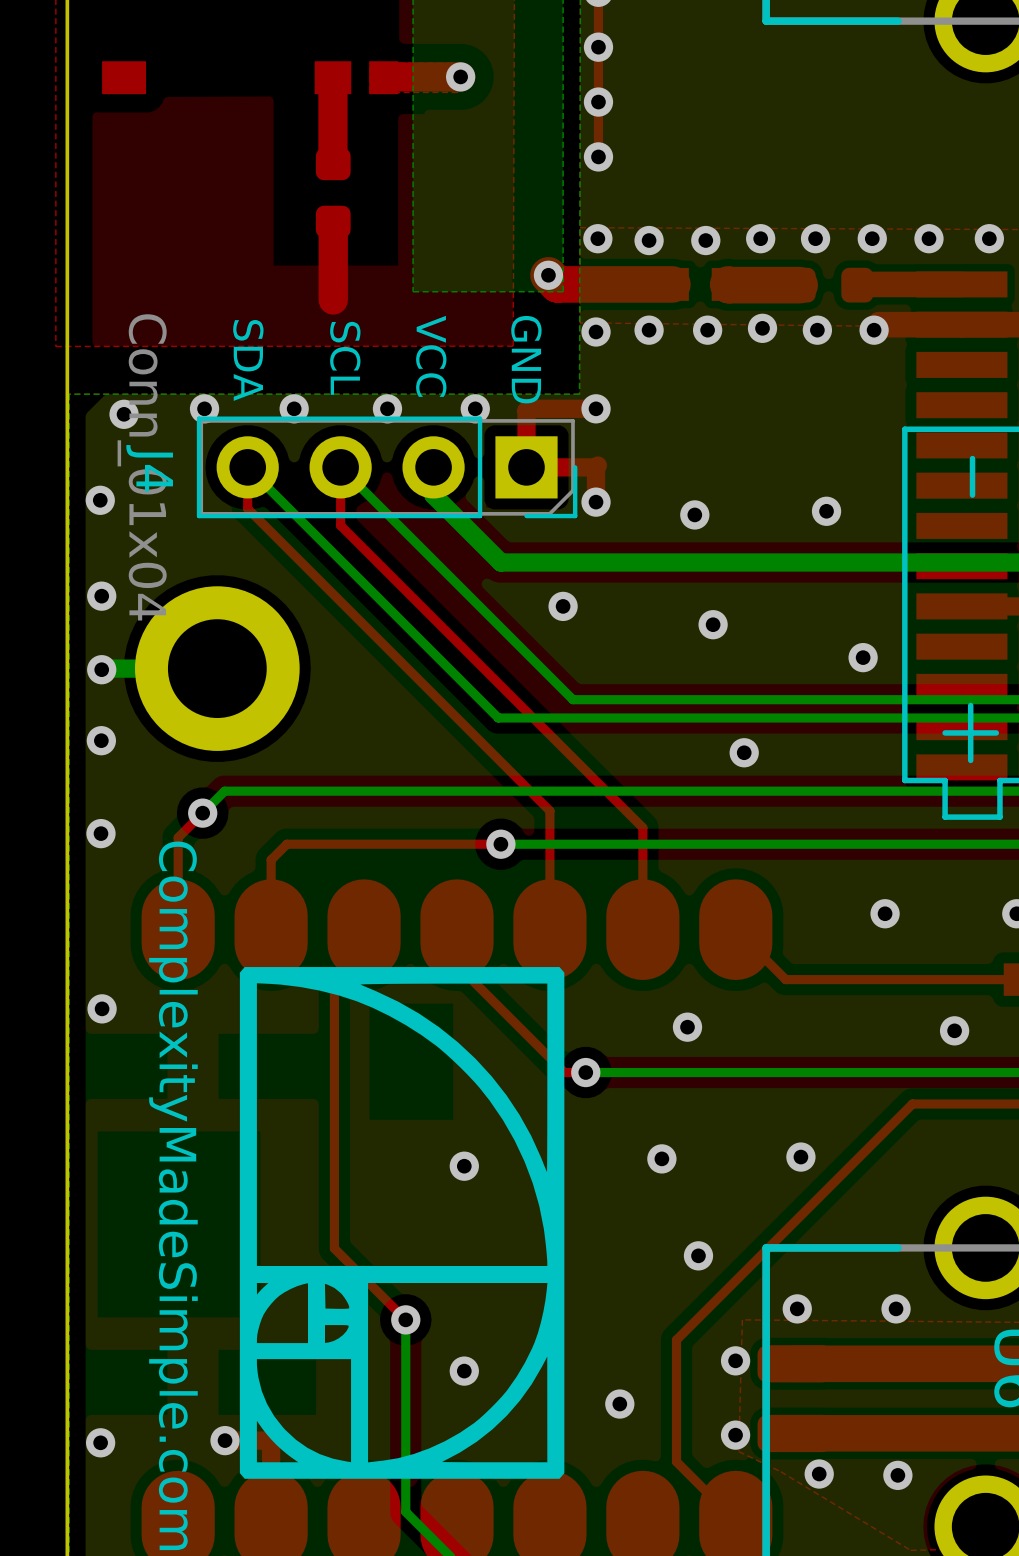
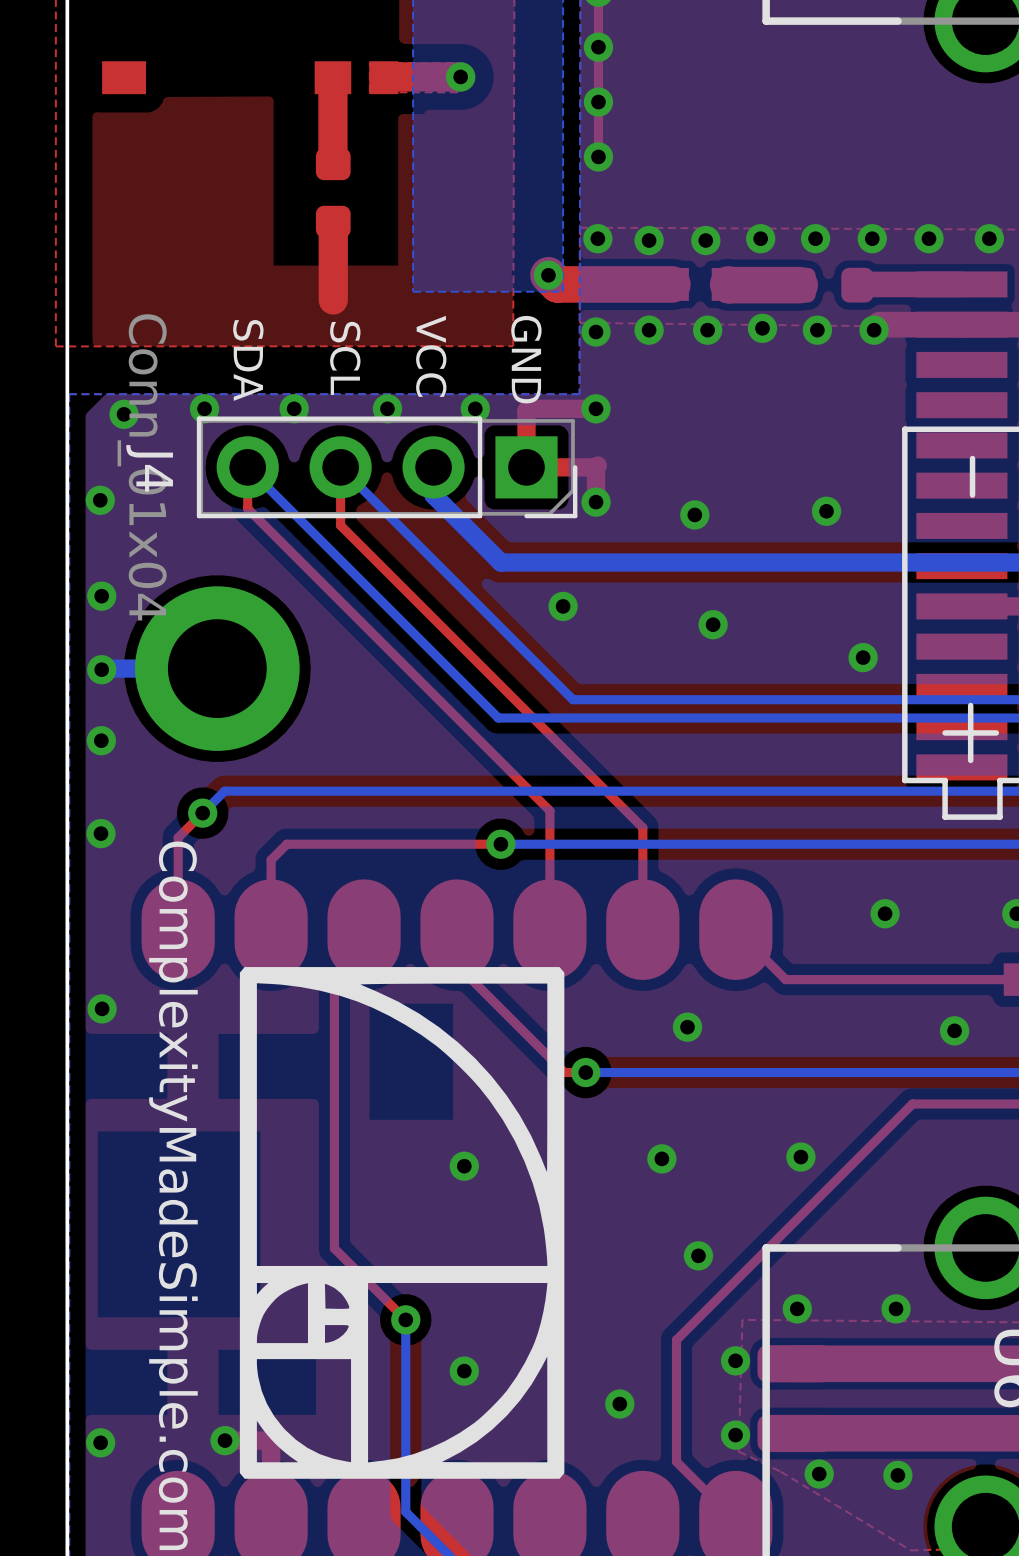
via: (744, 752) -> none

